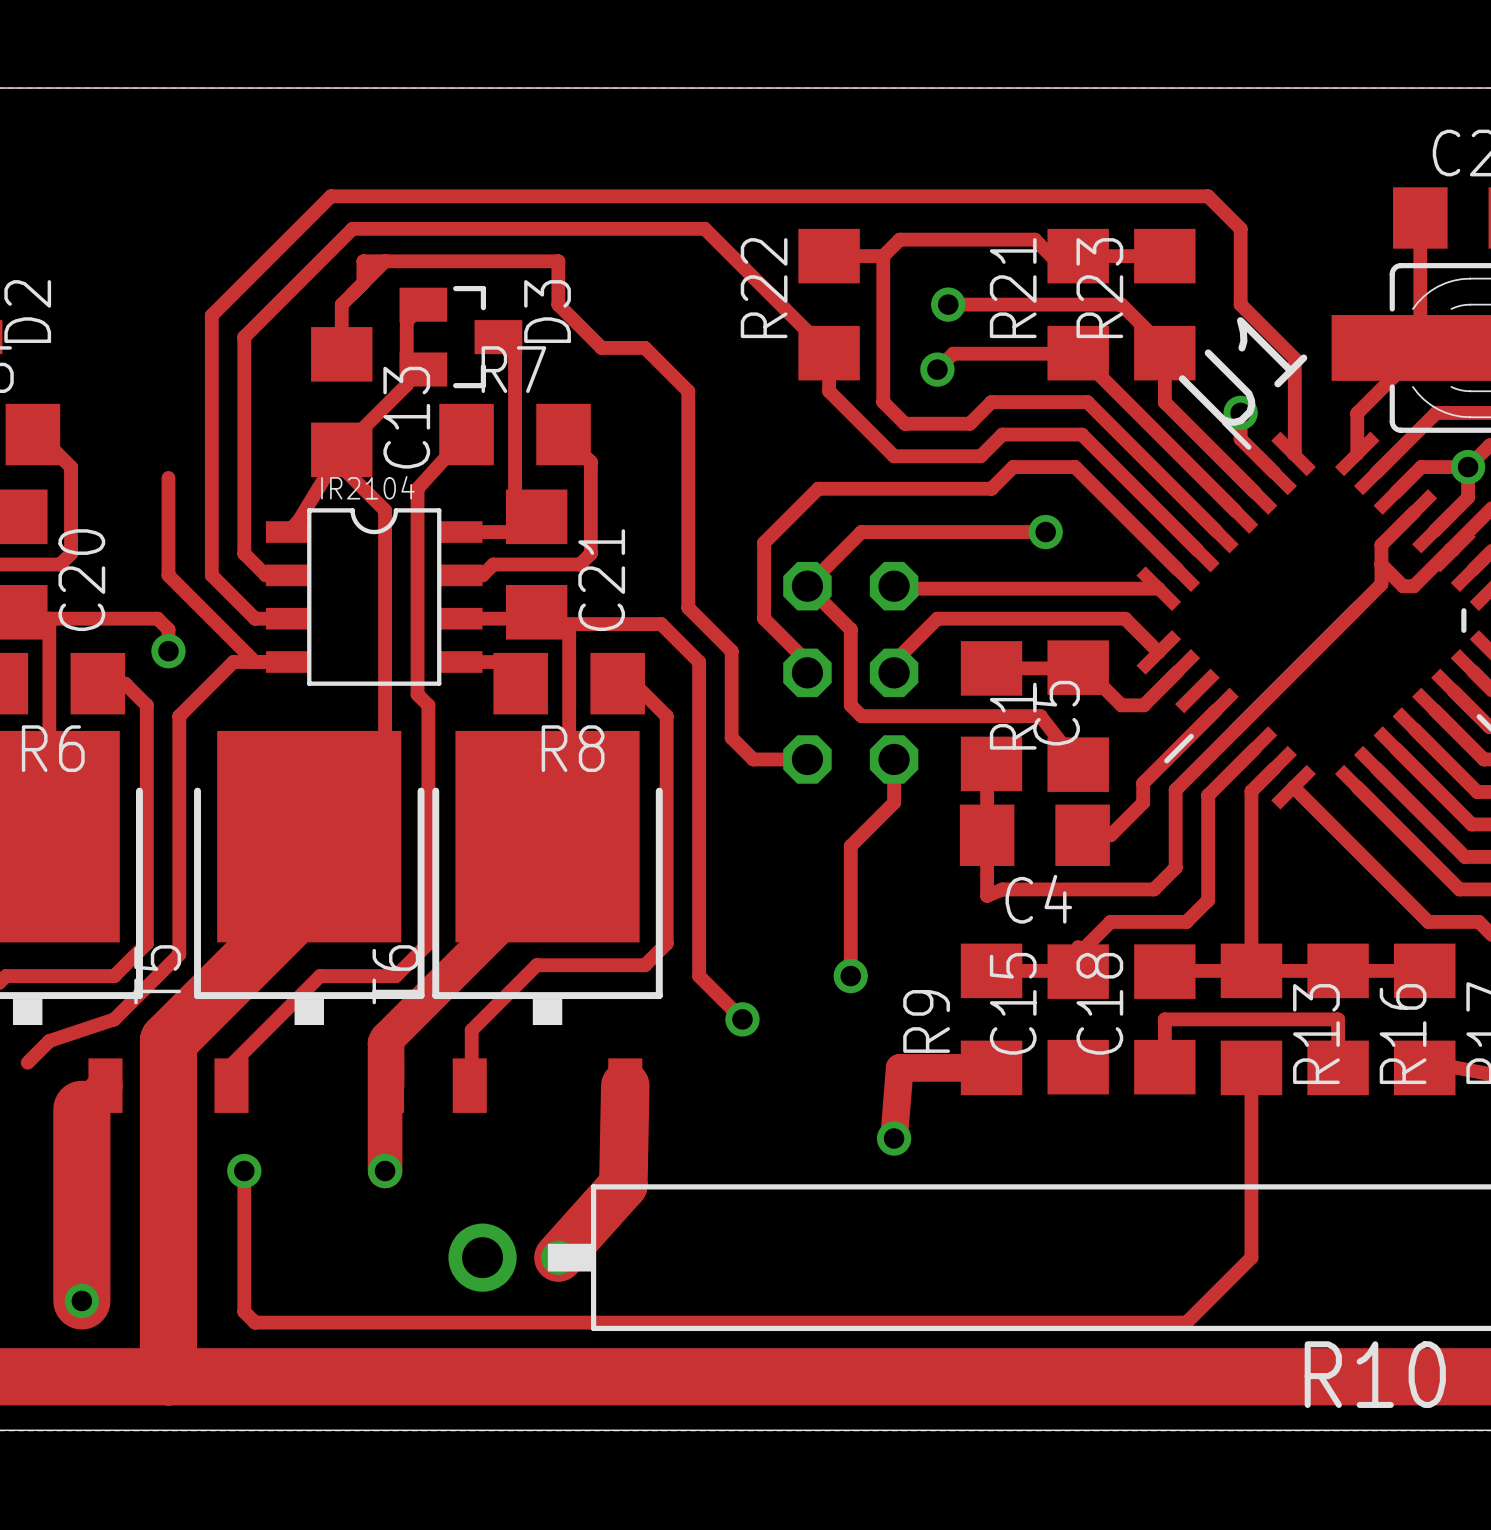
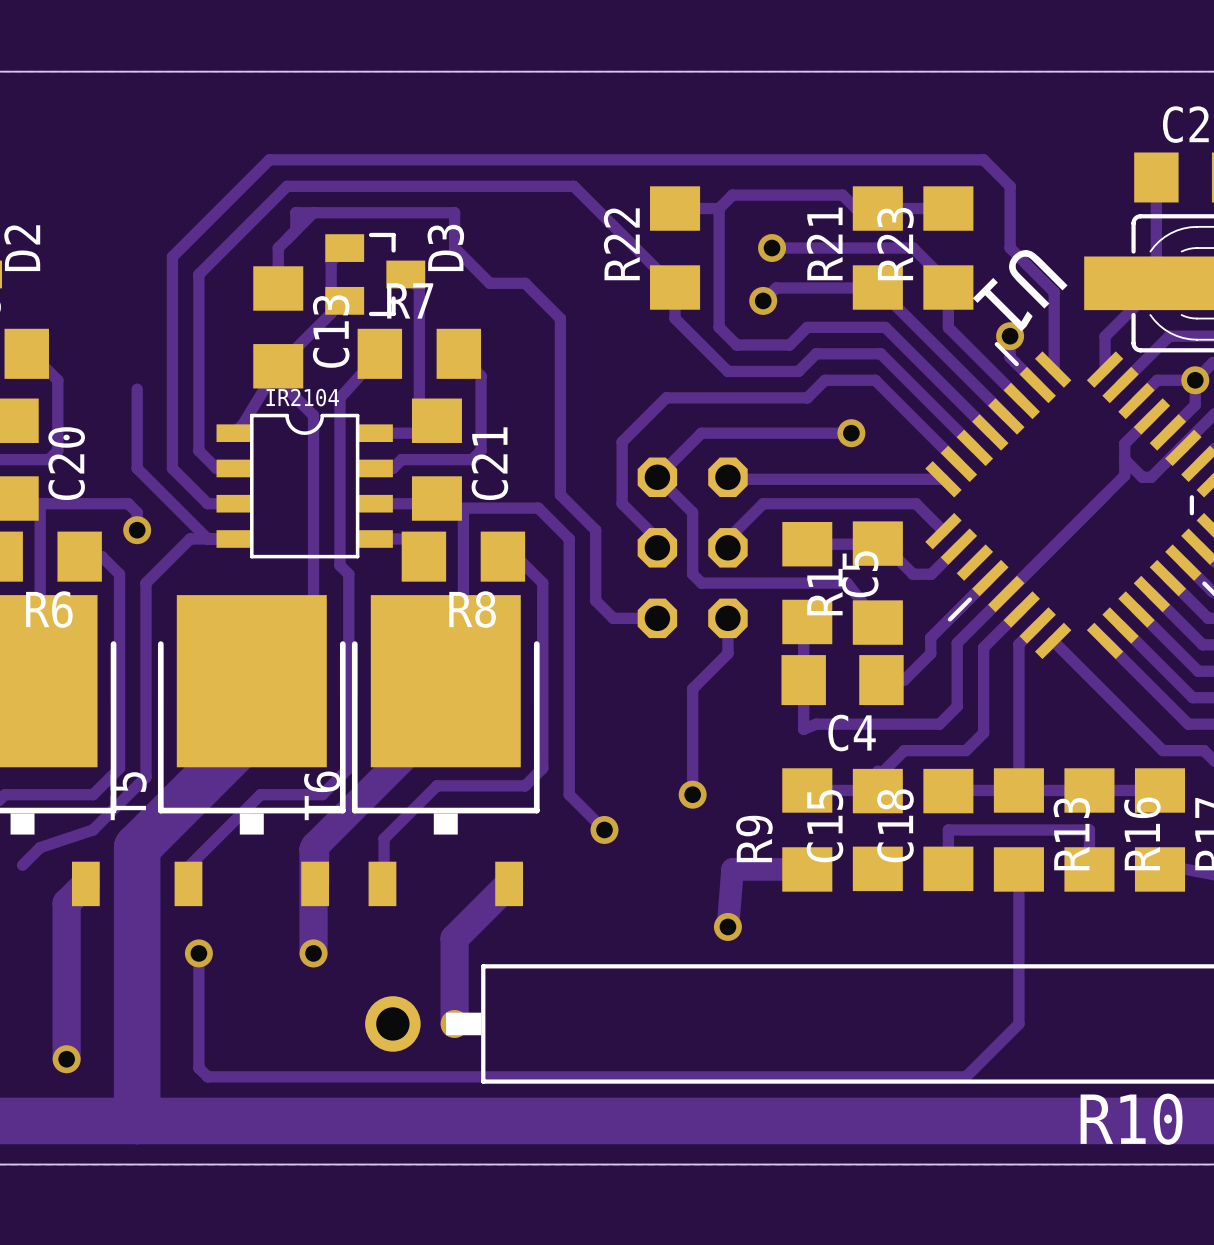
U1 name rotation: 0° (1243, 371) -> 180° (1020, 290)
track: (625, 1085) (623, 1185) (558, 1257) -> (509, 883) (454, 938) (454, 1023)
track width: thick (81, 1109) (81, 1300) -> thin (66, 903) (66, 1059)

